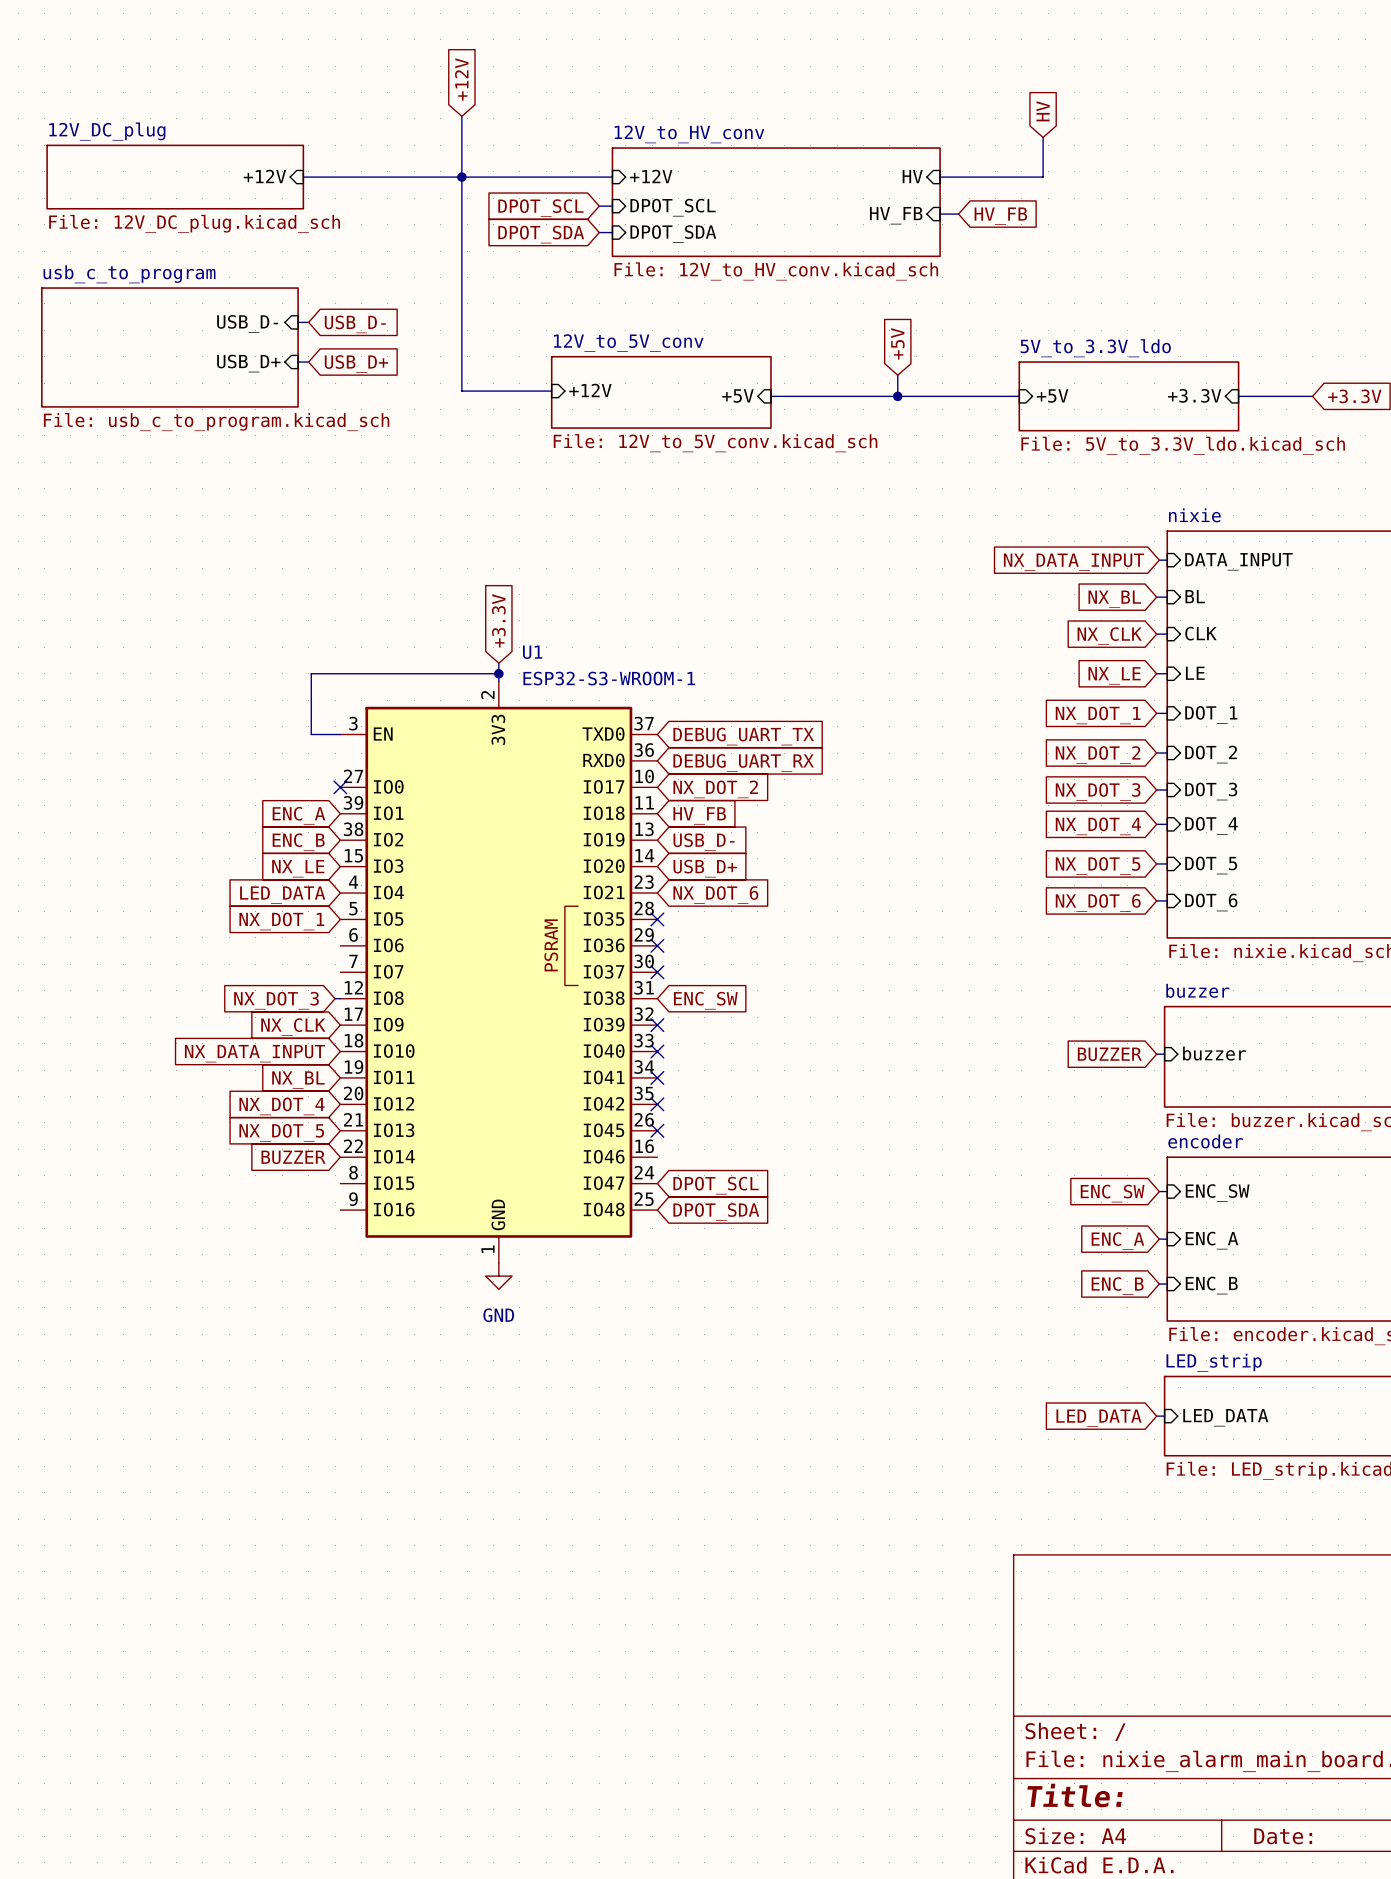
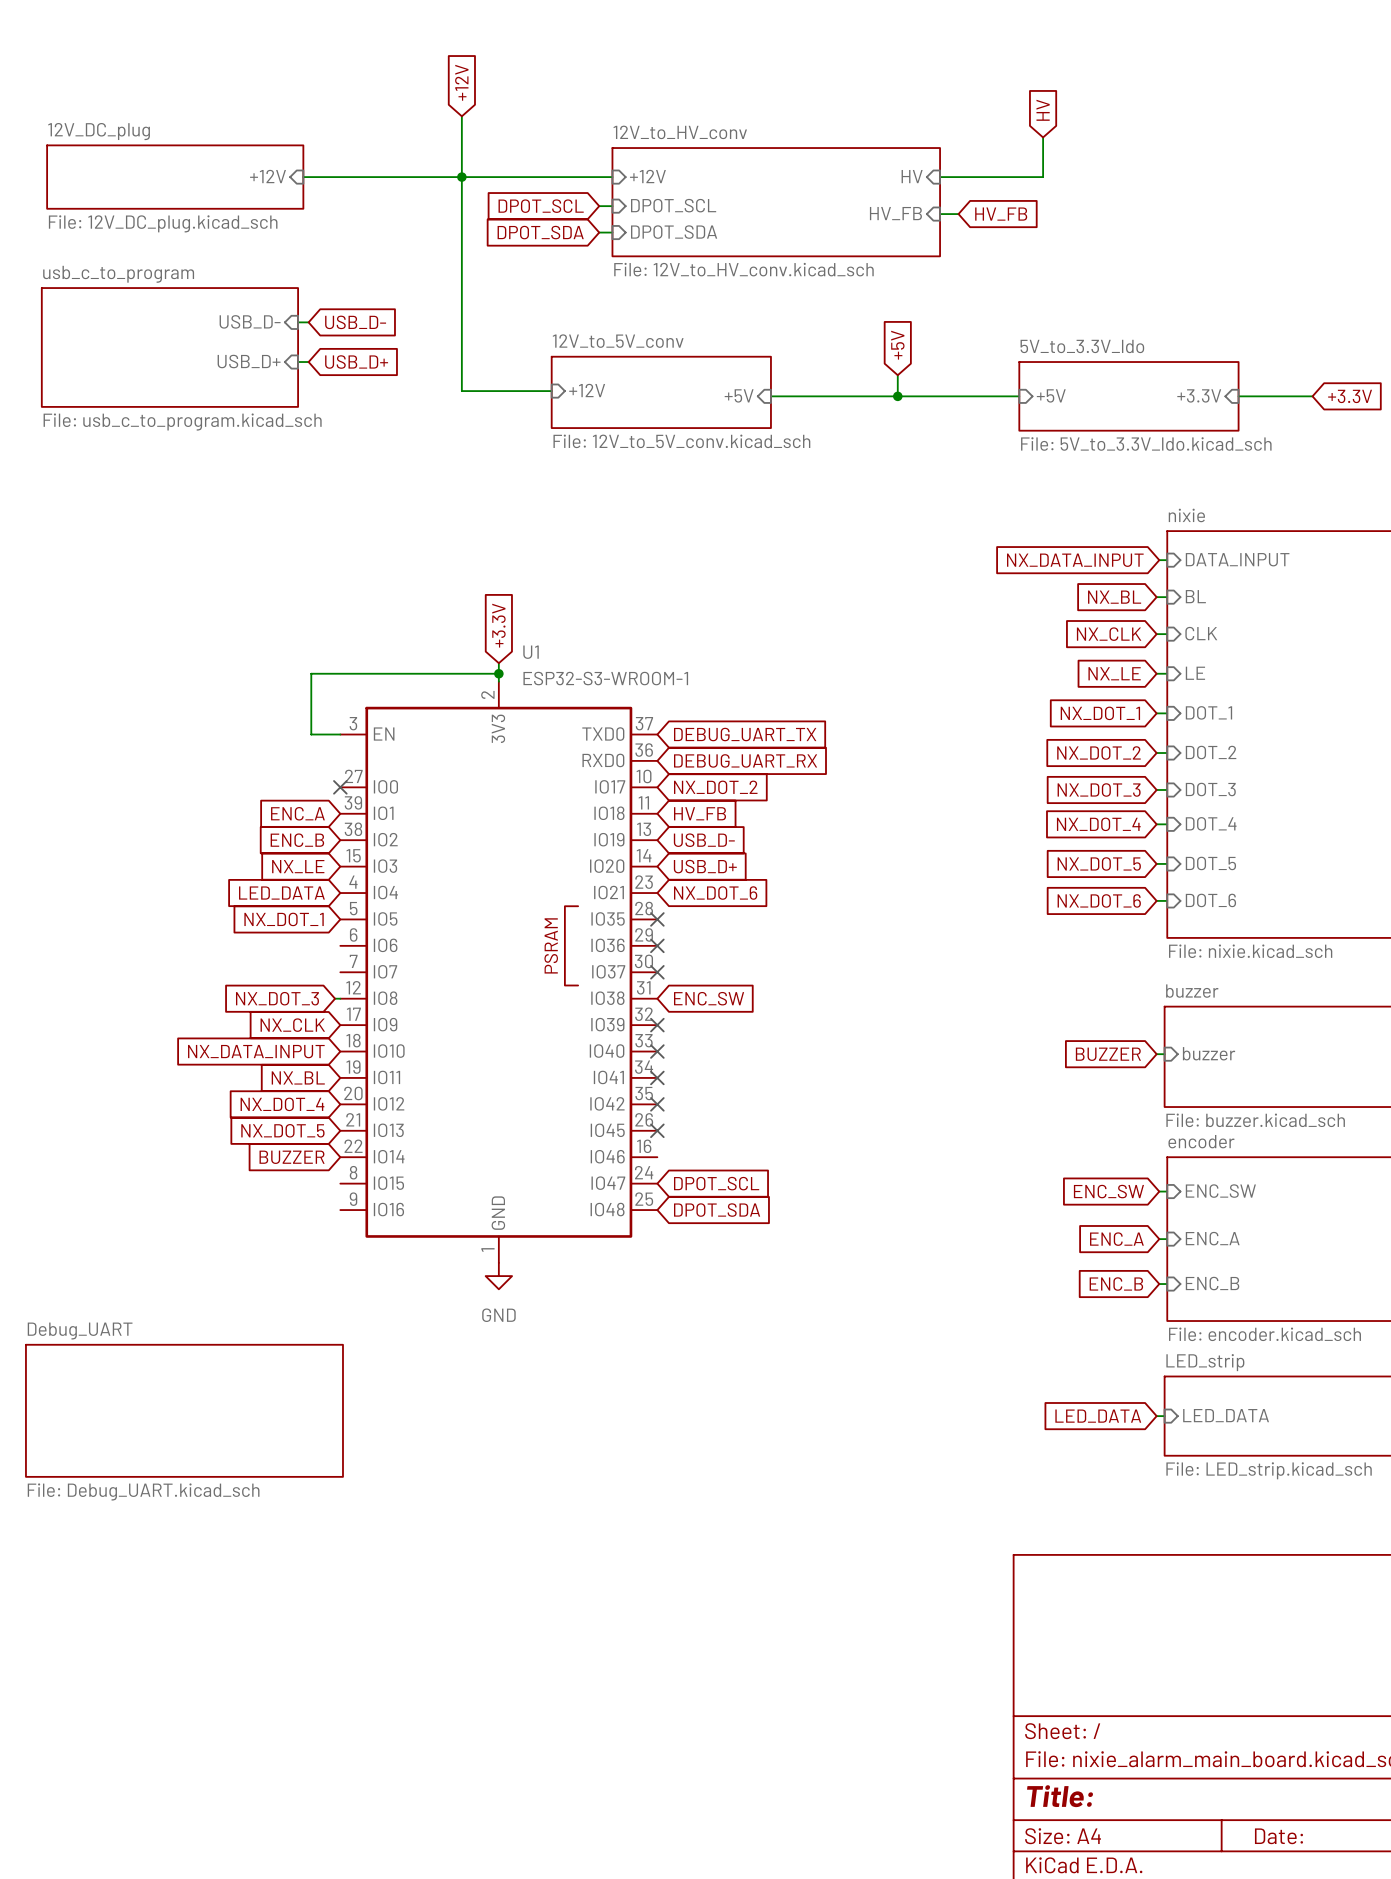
sheet Debug_UART: none -> File: Debug_UART.kicad_sch (184, 1410)

